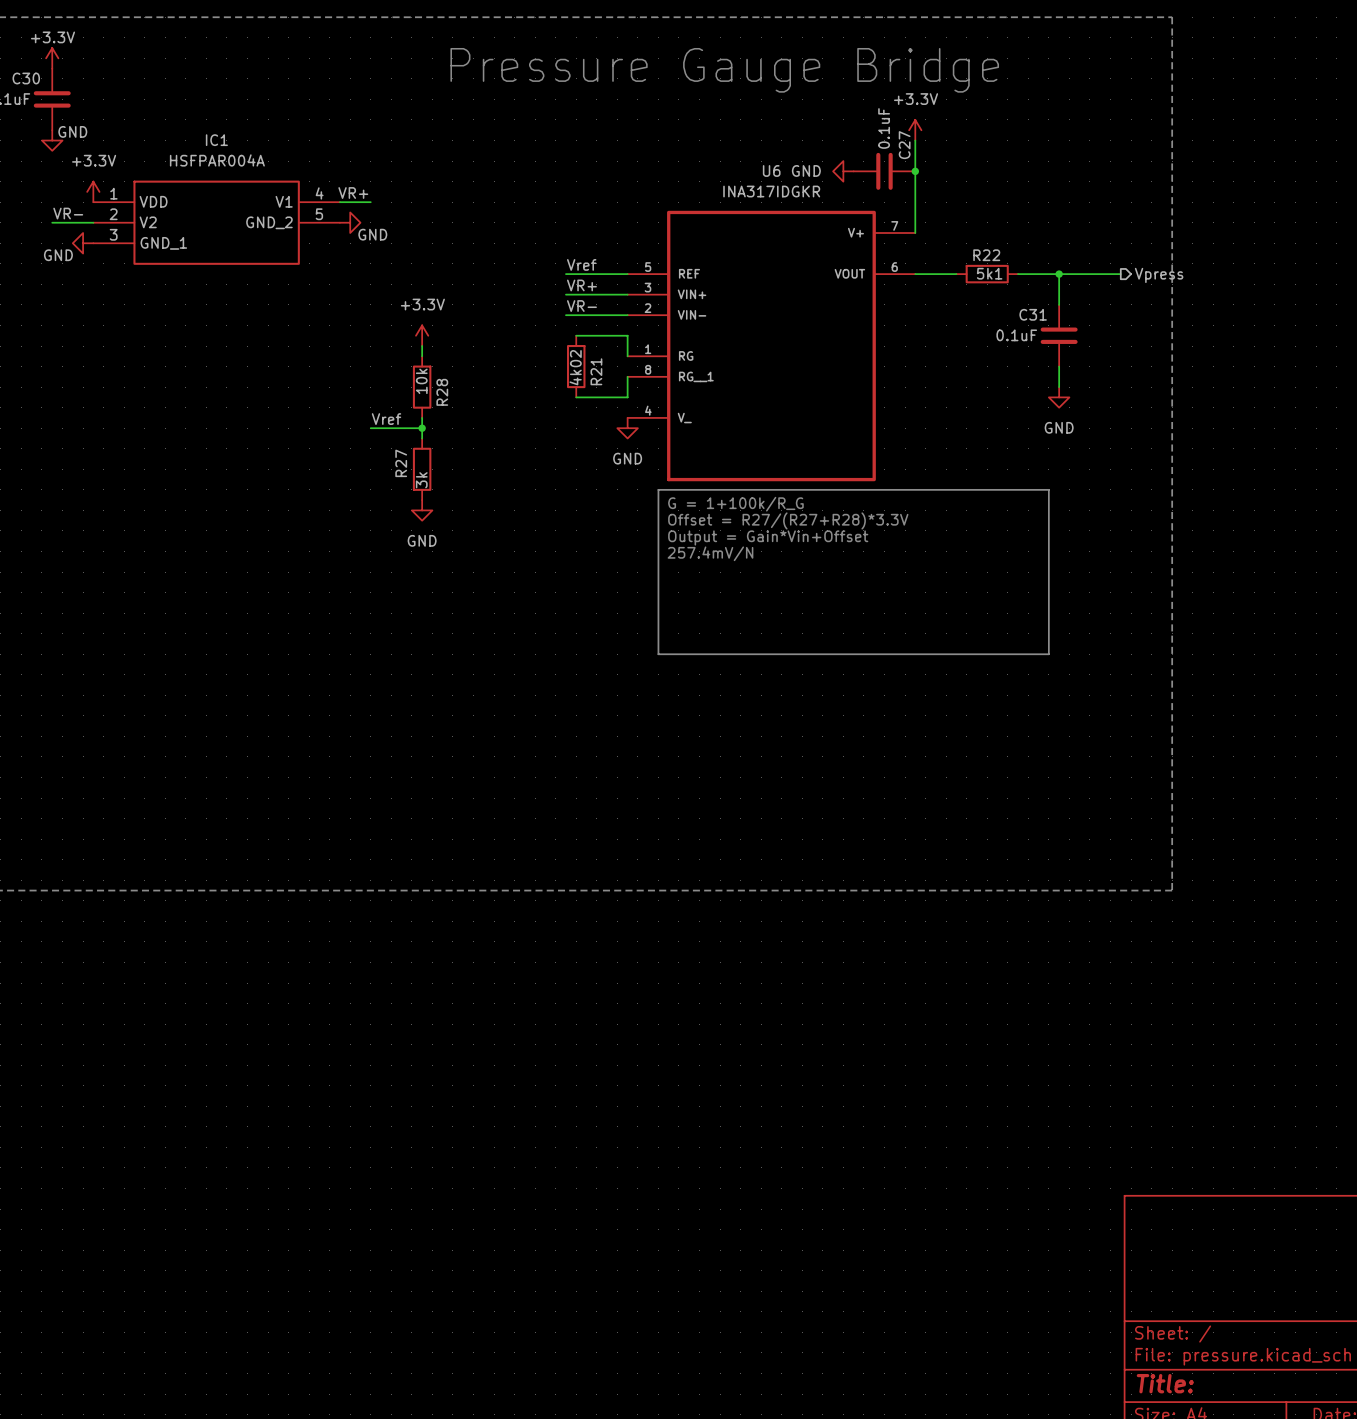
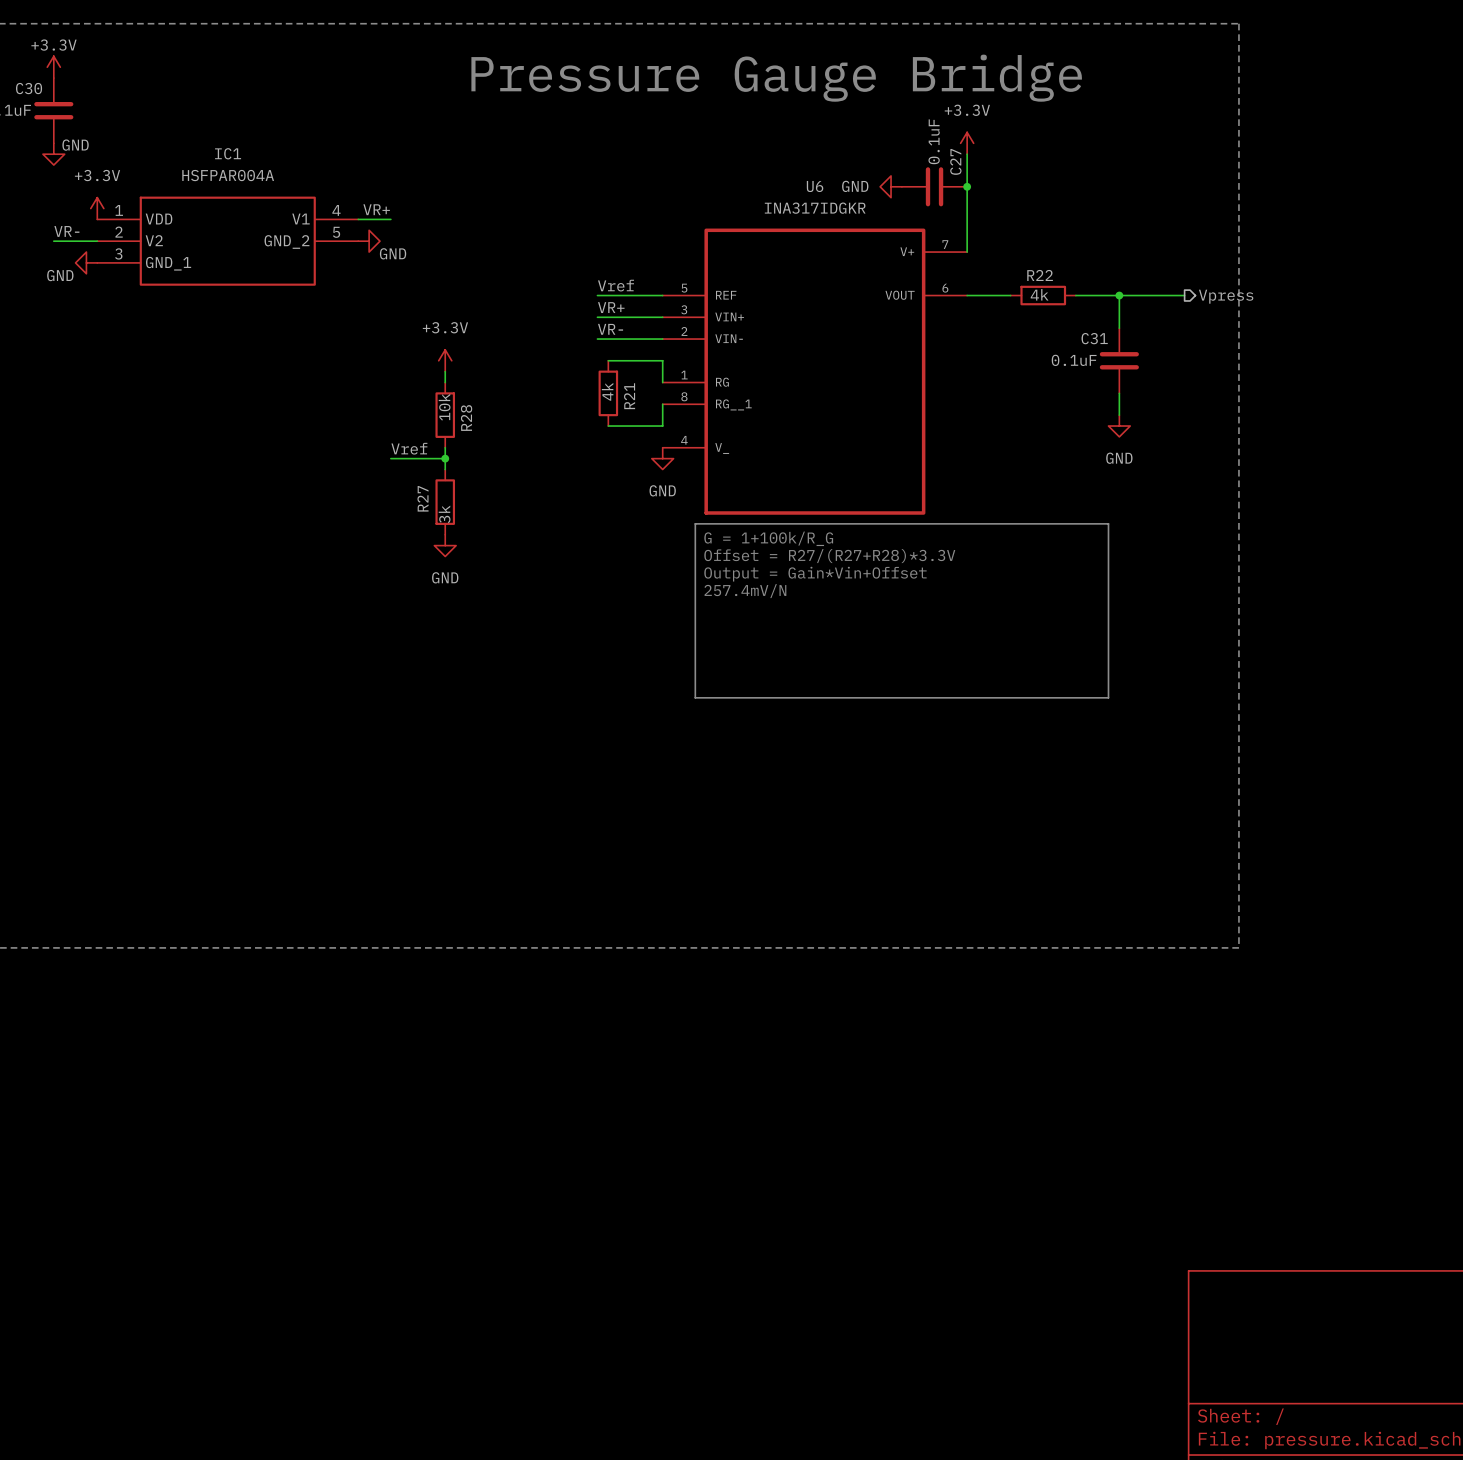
R22 value: 5k1 (989, 273) -> 4k (1039, 294)
R21 value: 4k02 (575, 367) -> 4k (607, 391)

